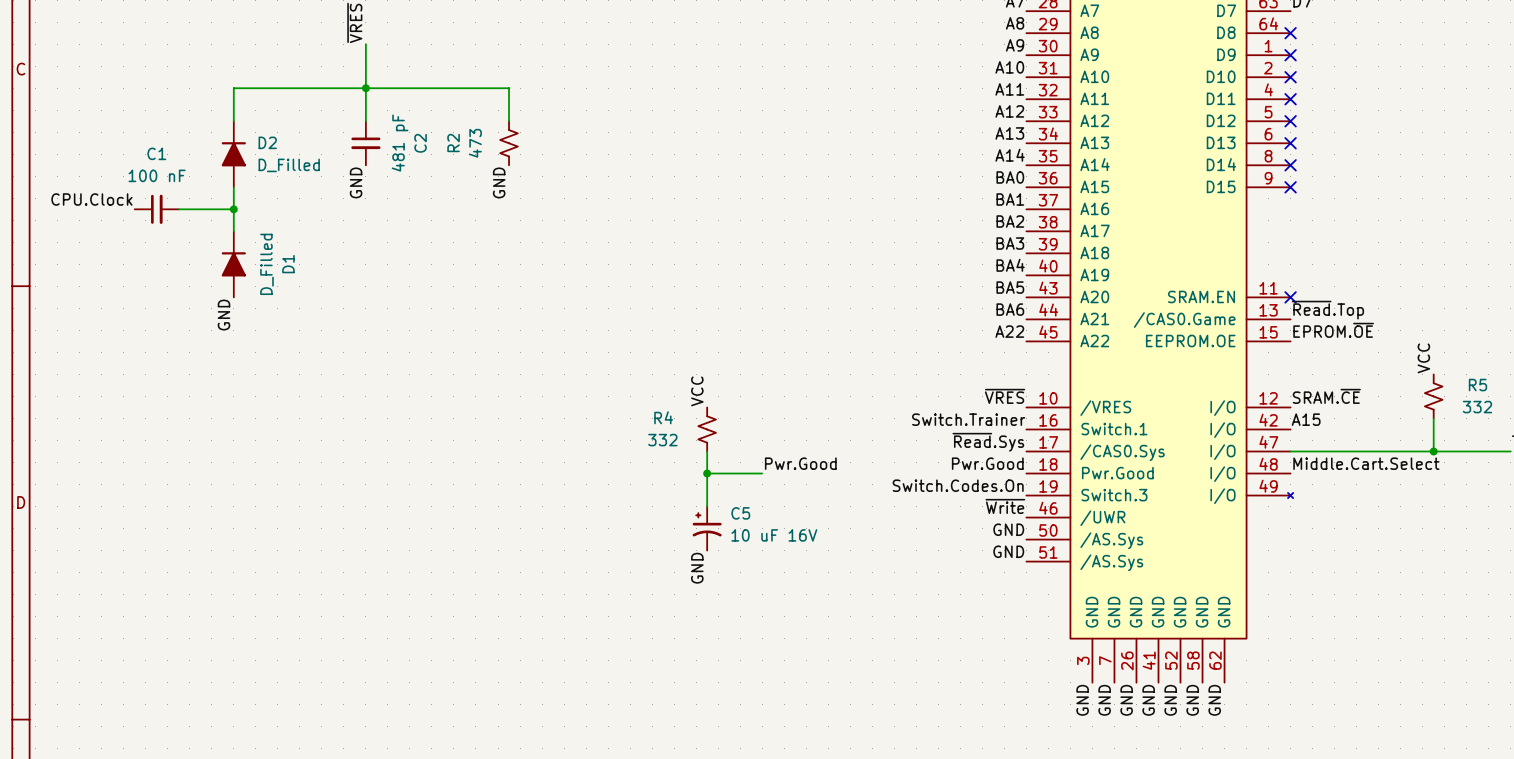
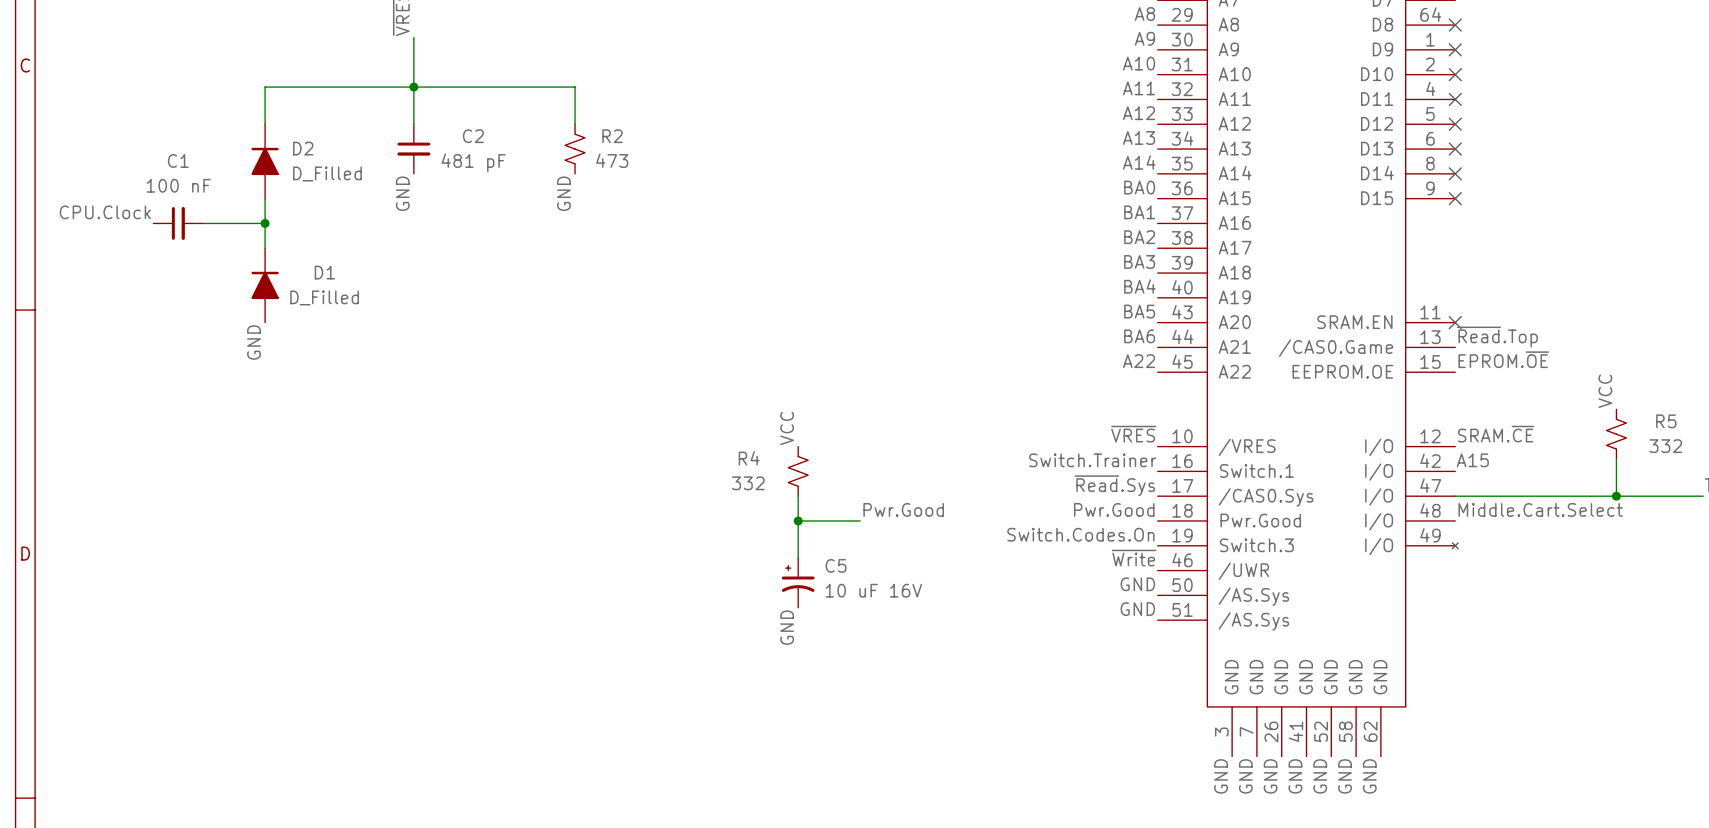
C2 value rotation: 0° (400, 143) -> 90° clockwise (473, 162)
C2 name rotation: 0° (420, 143) -> 90° clockwise (473, 136)
R2 name rotation: 0° (453, 143) -> 90° clockwise (612, 136)
R2 name position: R2 (453, 143) -> R2 (612, 136)
R2 value rotation: 0° (475, 143) -> 90° clockwise (612, 160)
R2 value position: 473 (475, 143) -> 473 (612, 160)
D1 value rotation: 0° (266, 264) -> 90° clockwise (324, 297)
D1 name rotation: 0° (288, 264) -> 90° clockwise (324, 272)

